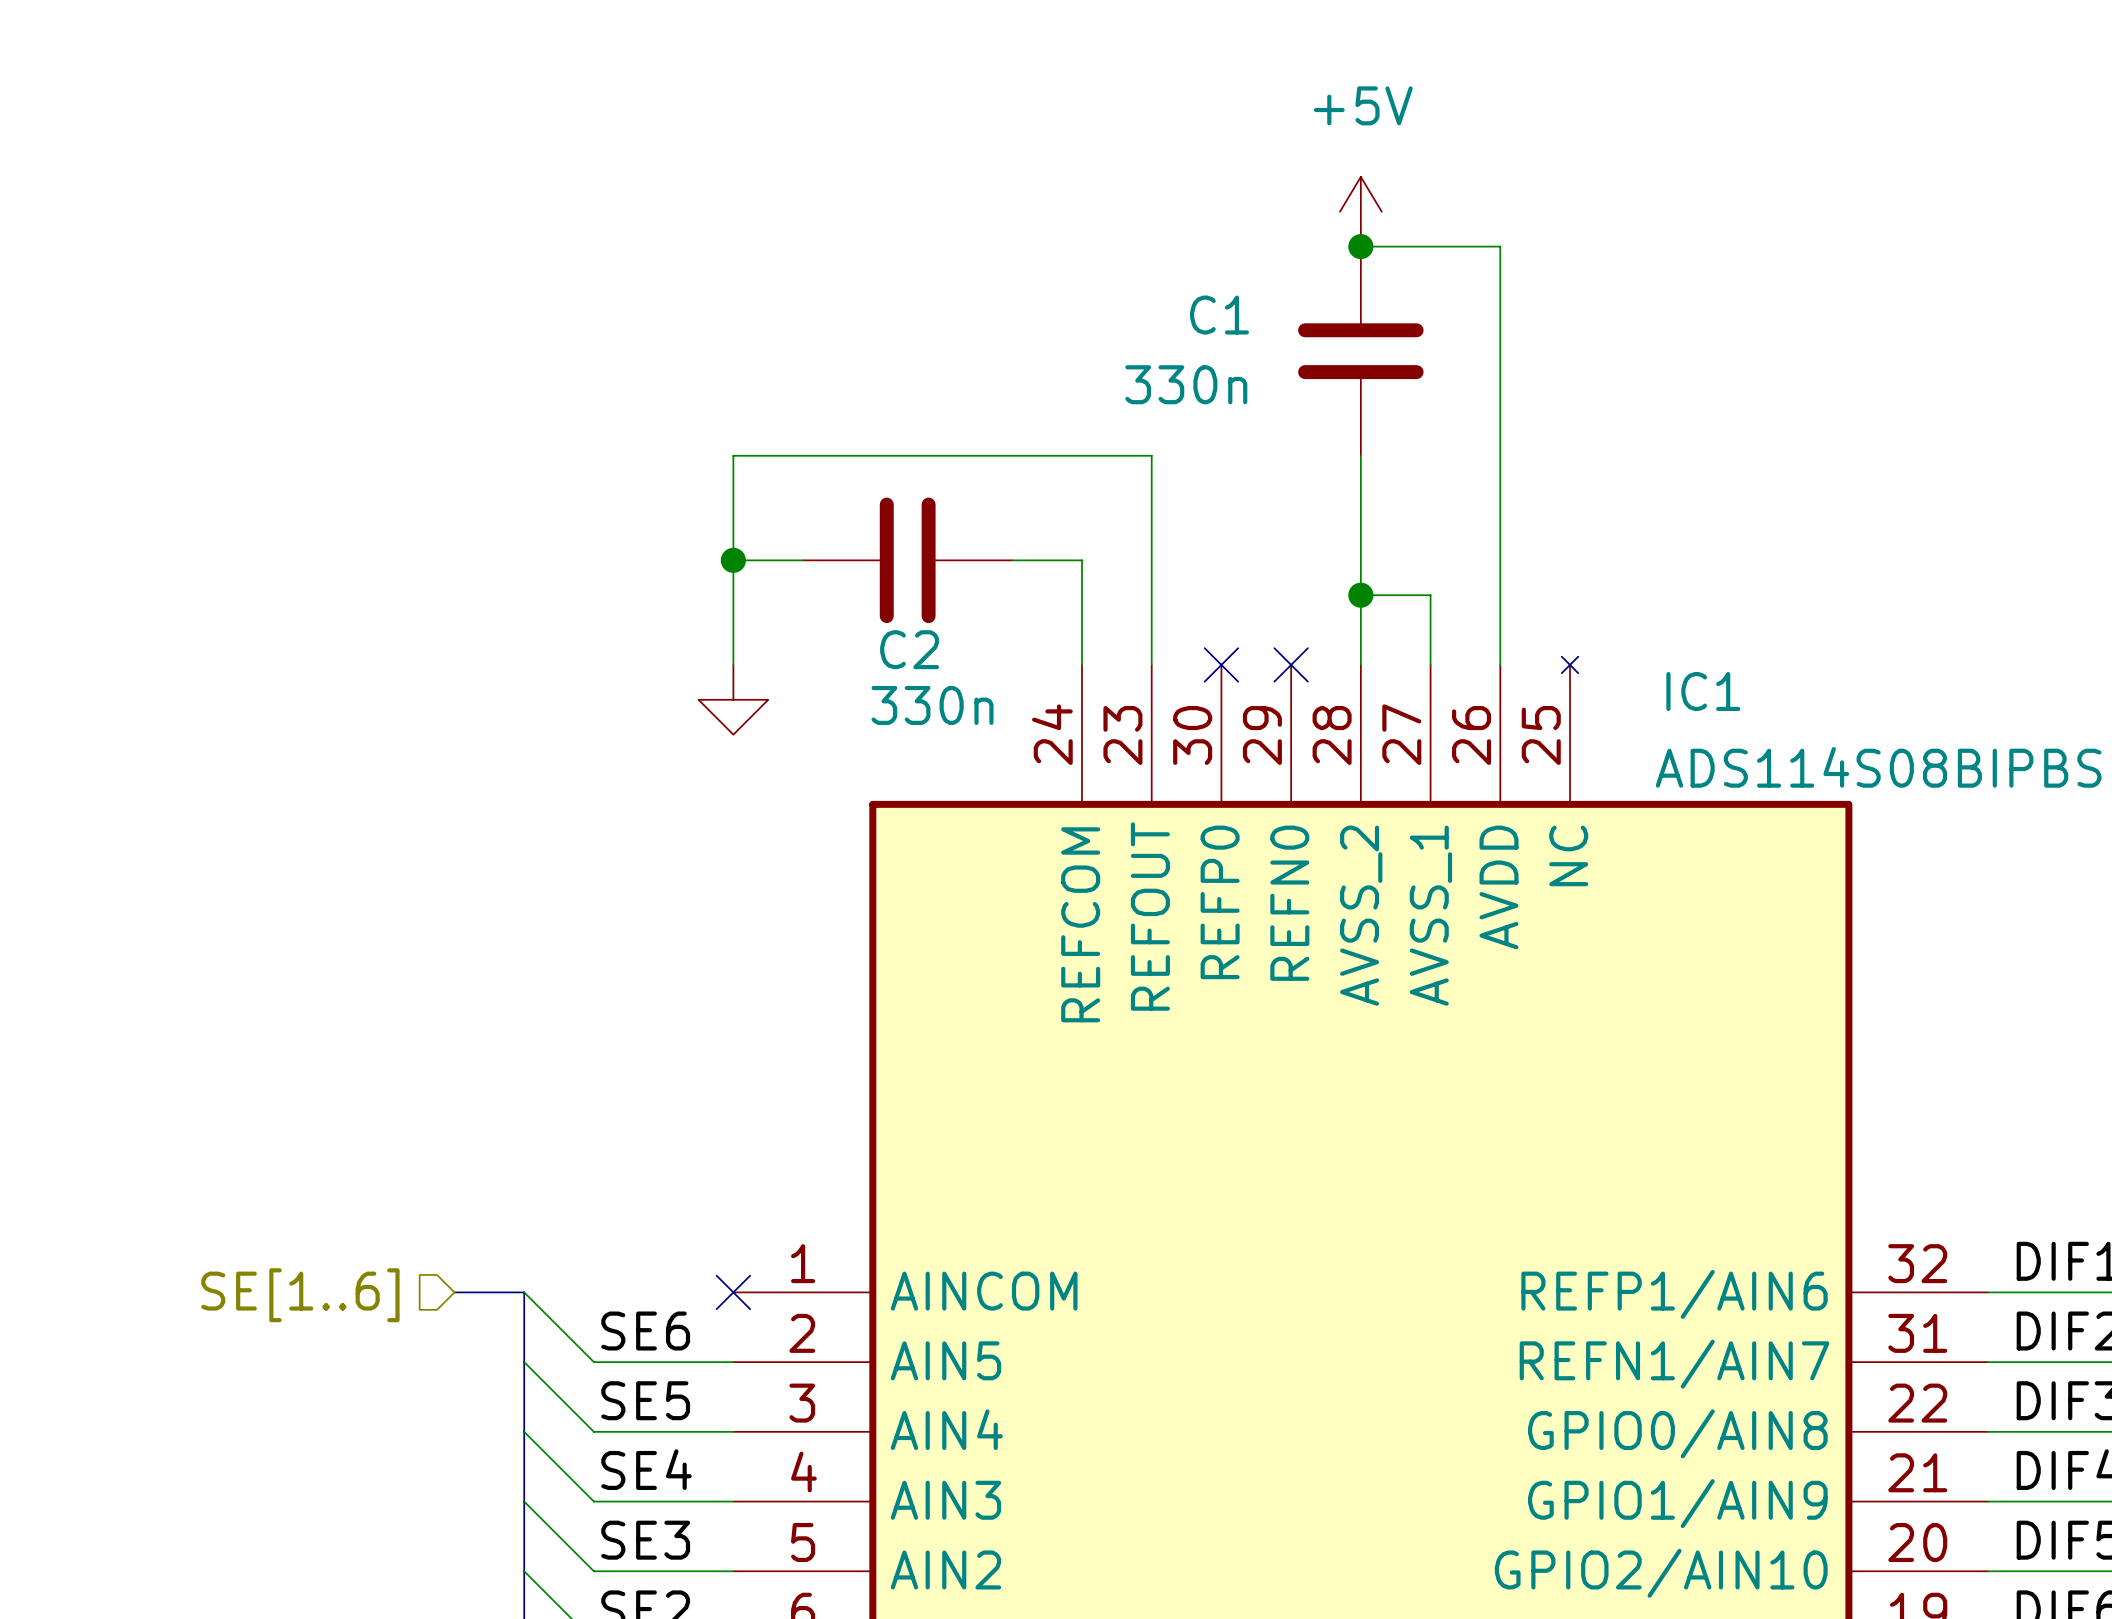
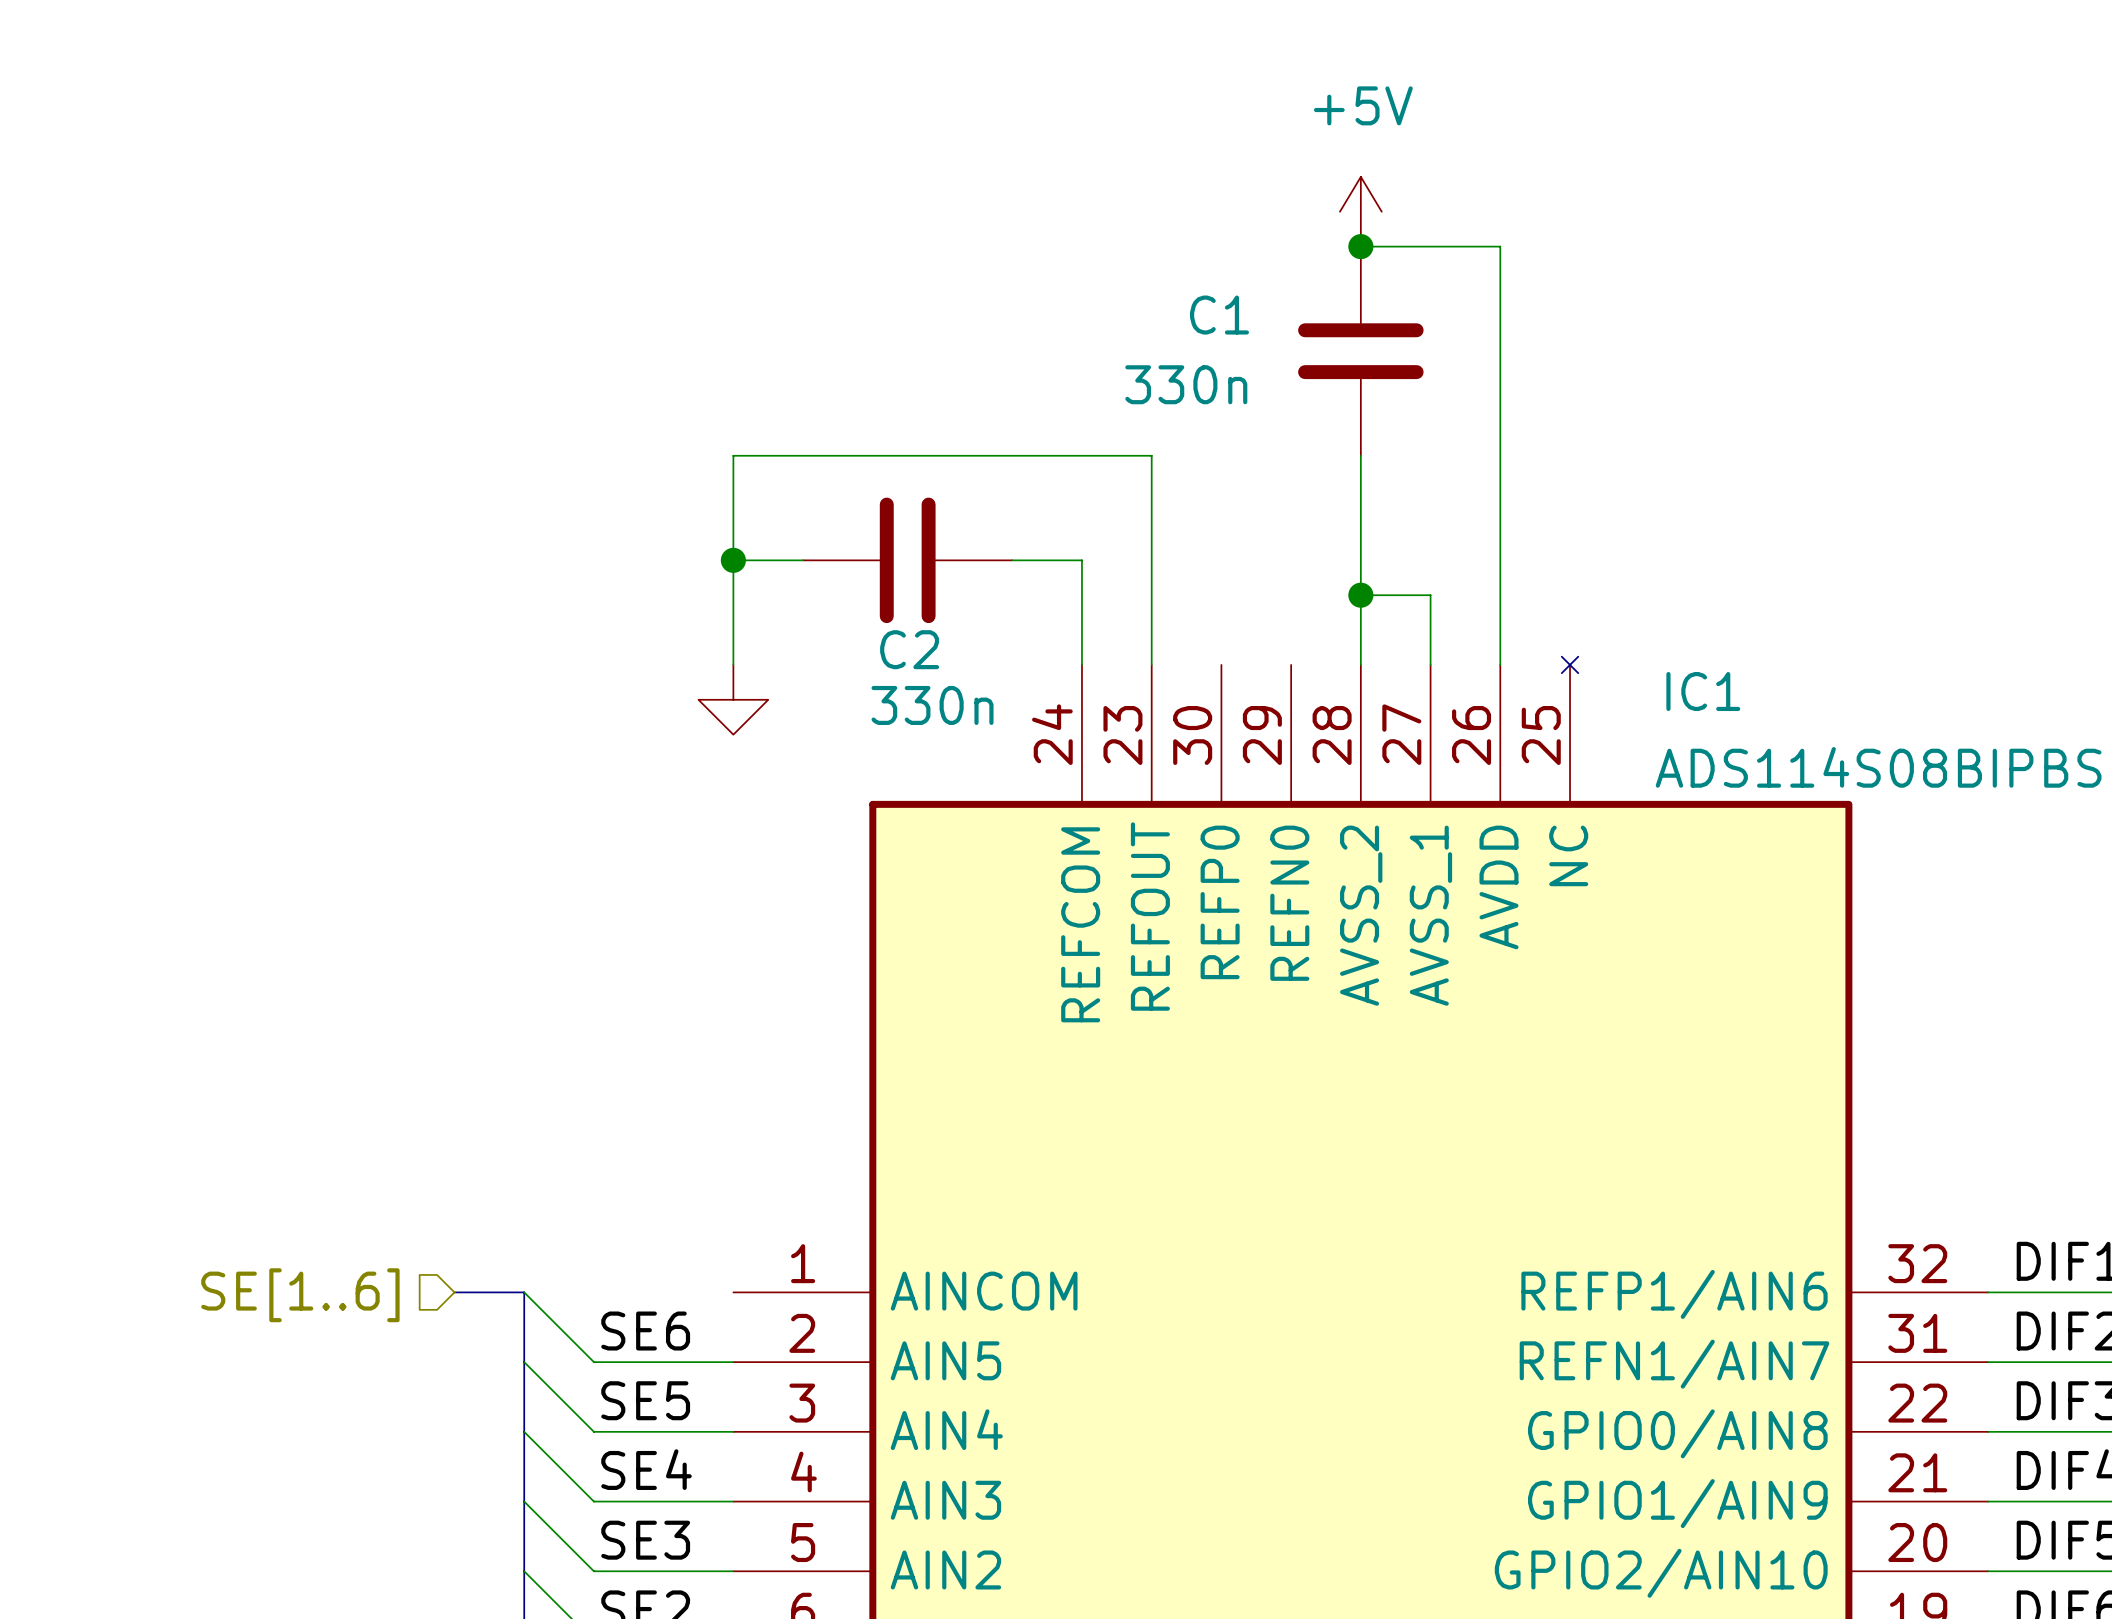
no-connect mark: (1221, 664) -> none
no-connect mark: (1291, 664) -> none
no-connect mark: (733, 1292) -> none

